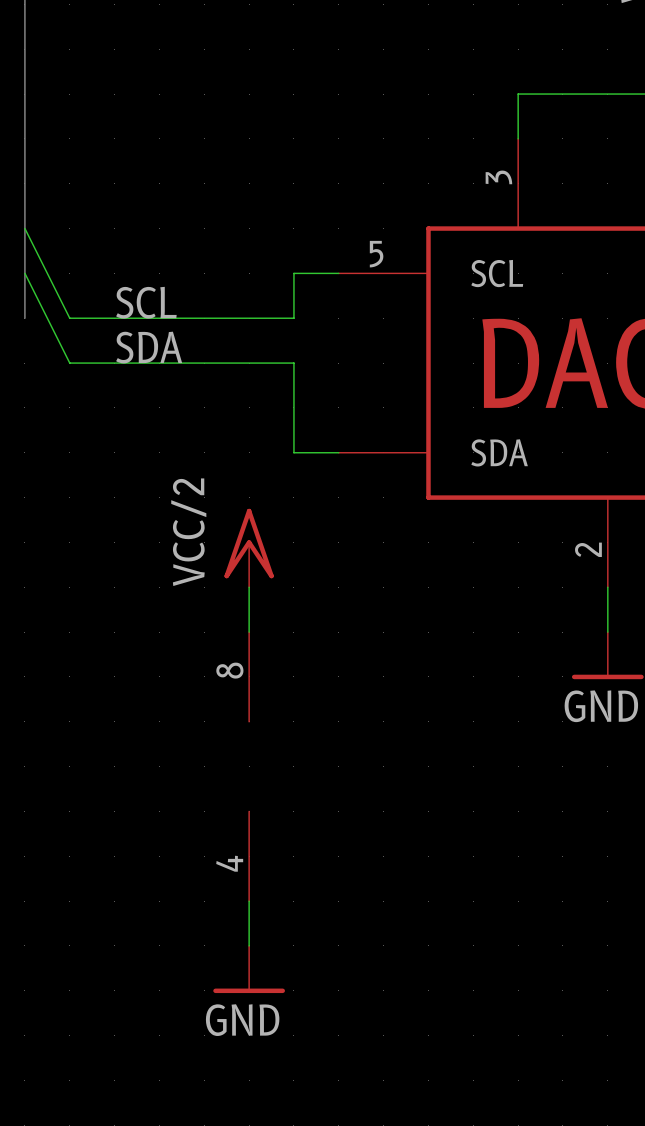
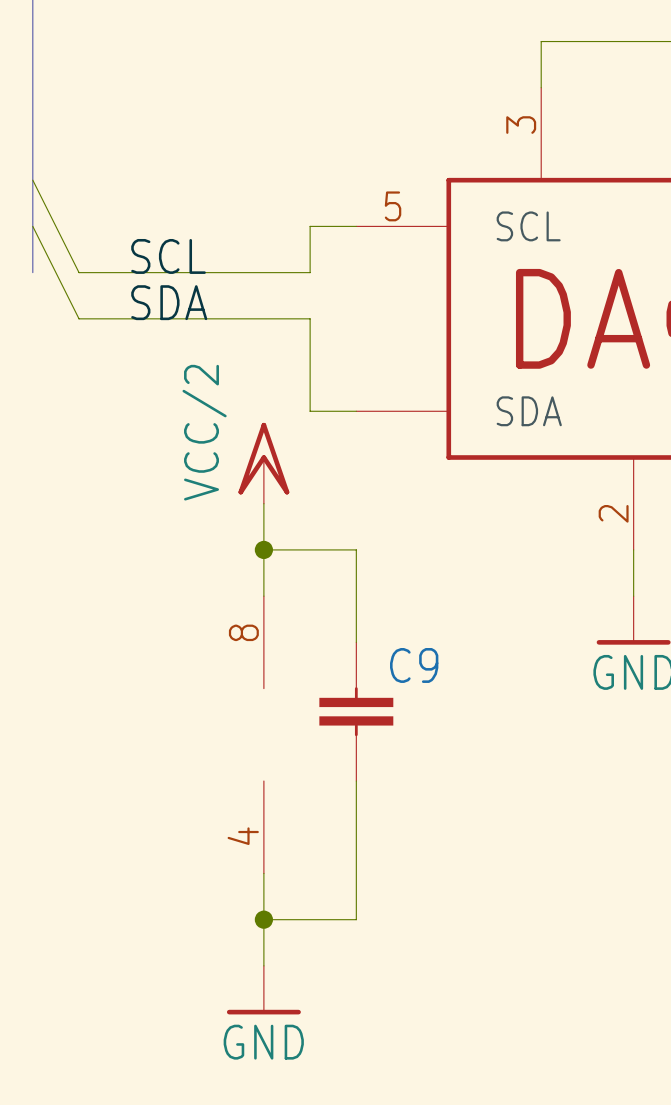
wire: none -> (263, 503) (263, 549) (356, 549) (356, 642)
power symbol position: VCC/2 (249, 548) -> VCC/2 (263, 463)
junction: none -> (263, 549)
C9: none -> (356, 711)
wire: none -> (356, 781) (356, 919) (263, 919) (263, 965)
junction: none -> (263, 919)
power symbol position: GND (249, 969) -> GND (263, 990)

